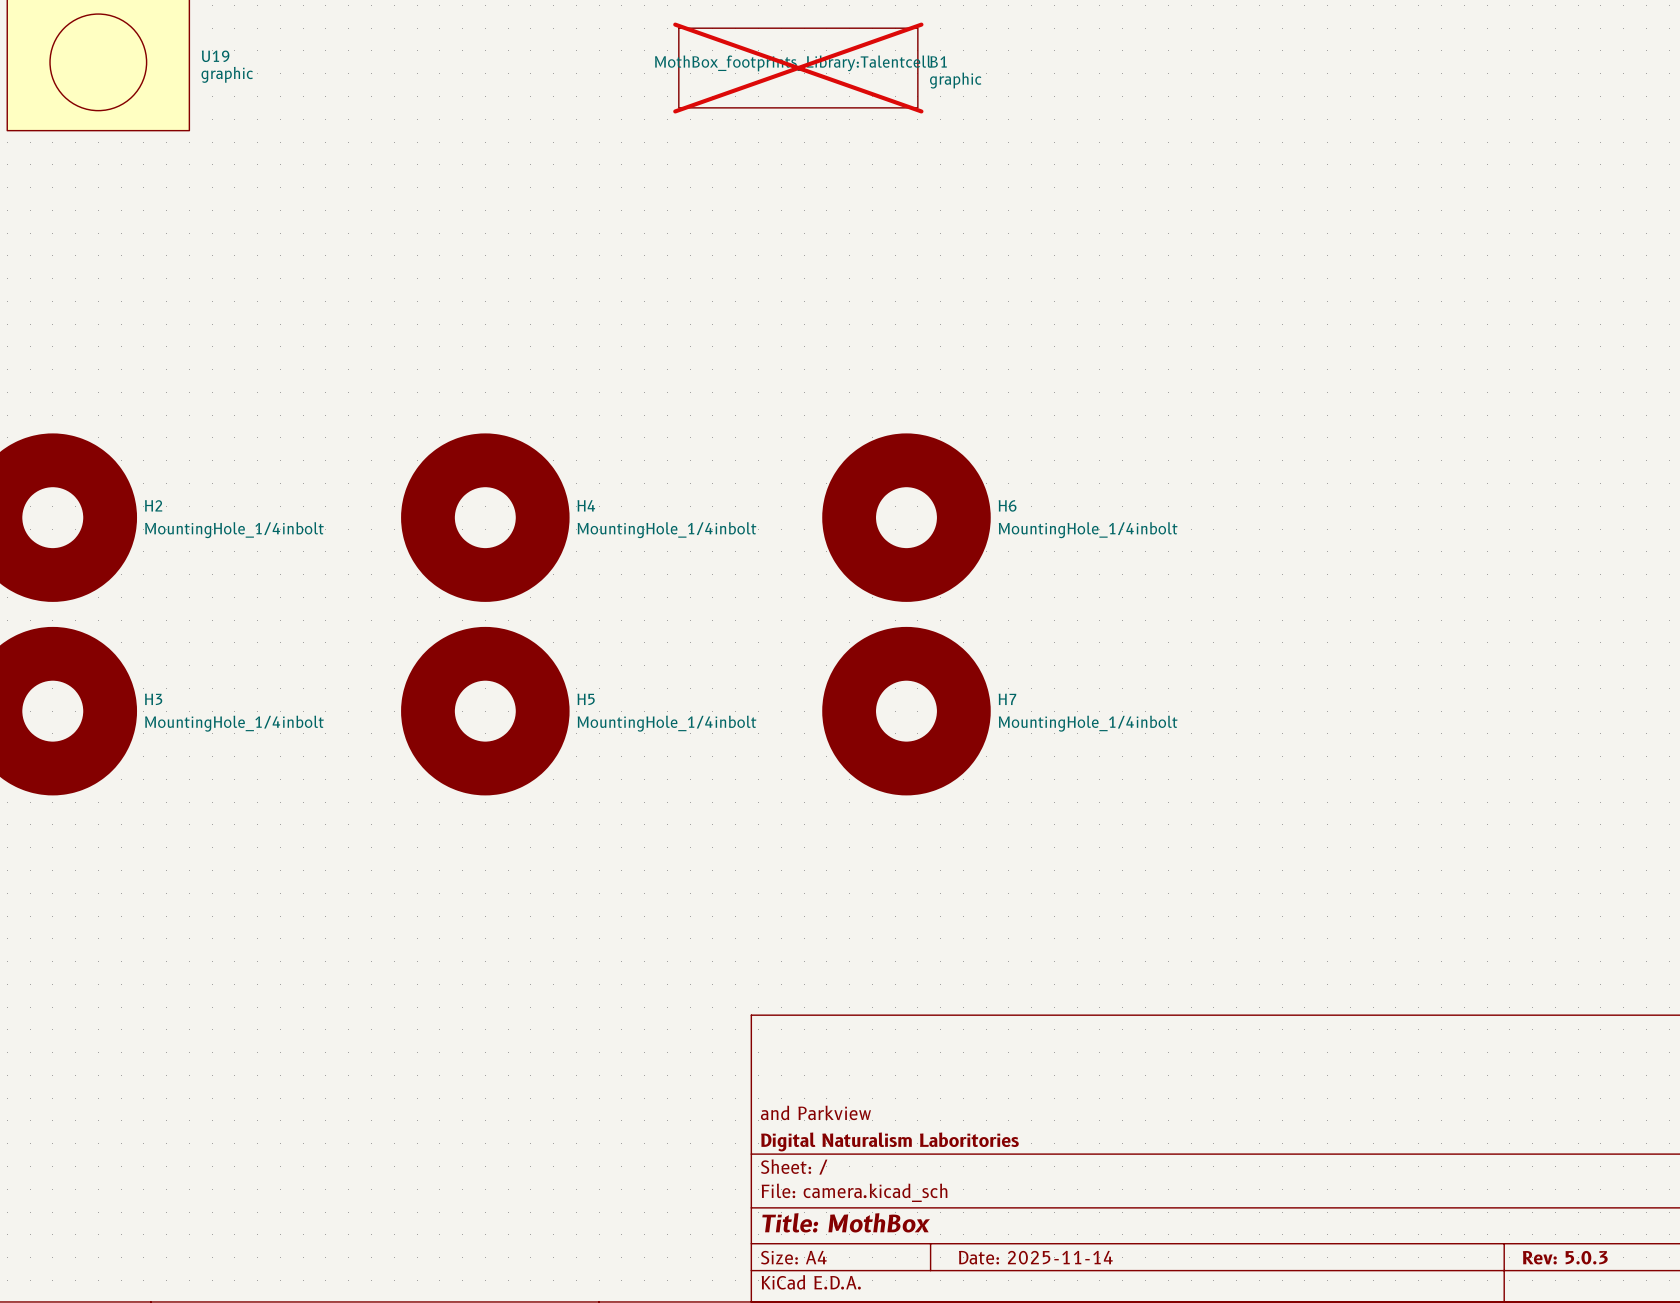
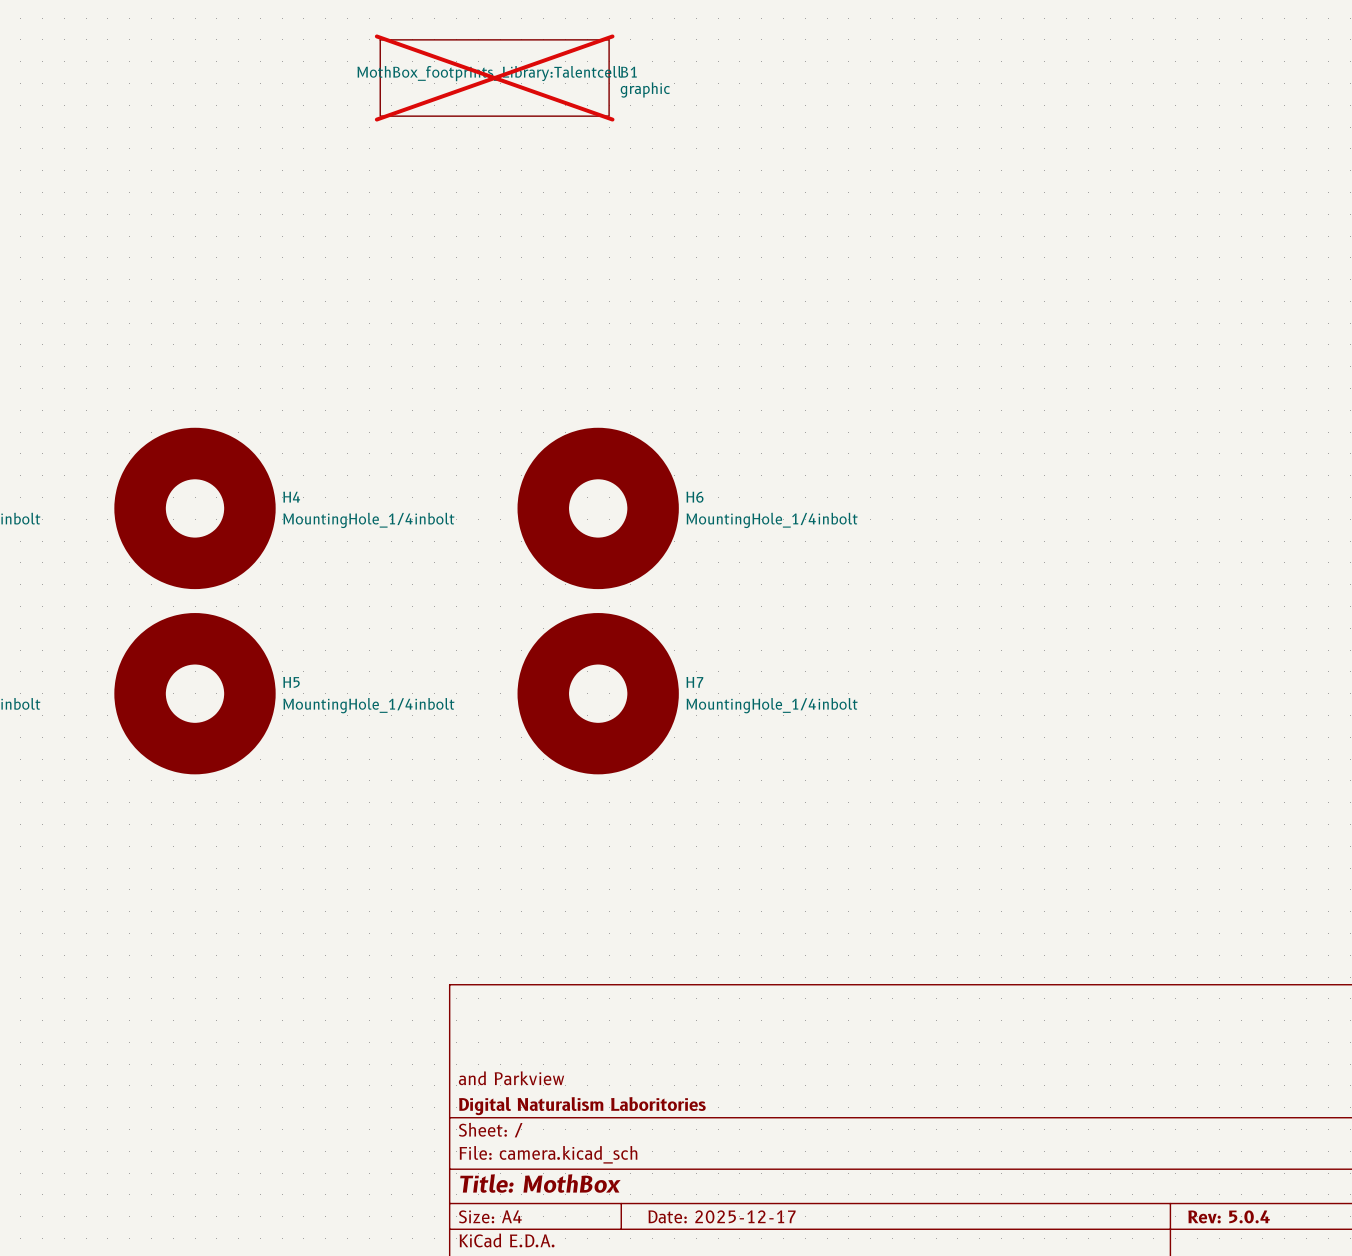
title block: Date: 2025-11-14 (1035, 1257) -> Date: 2025-12-17 (722, 1216)
title block: Rev: 5.0.3 (1565, 1257) -> Rev: 5.0.4 (1229, 1216)

